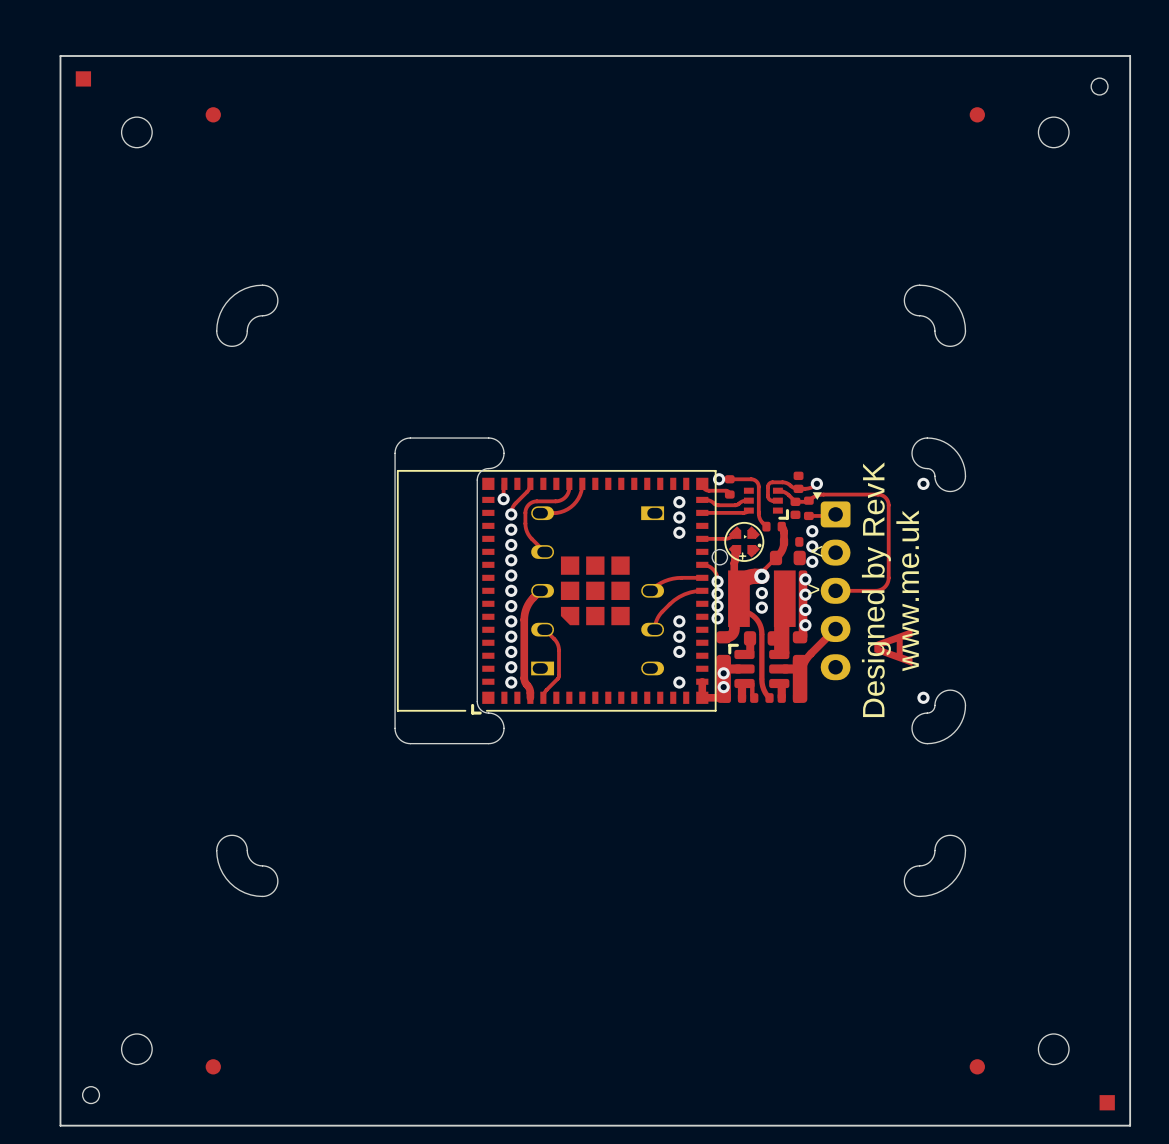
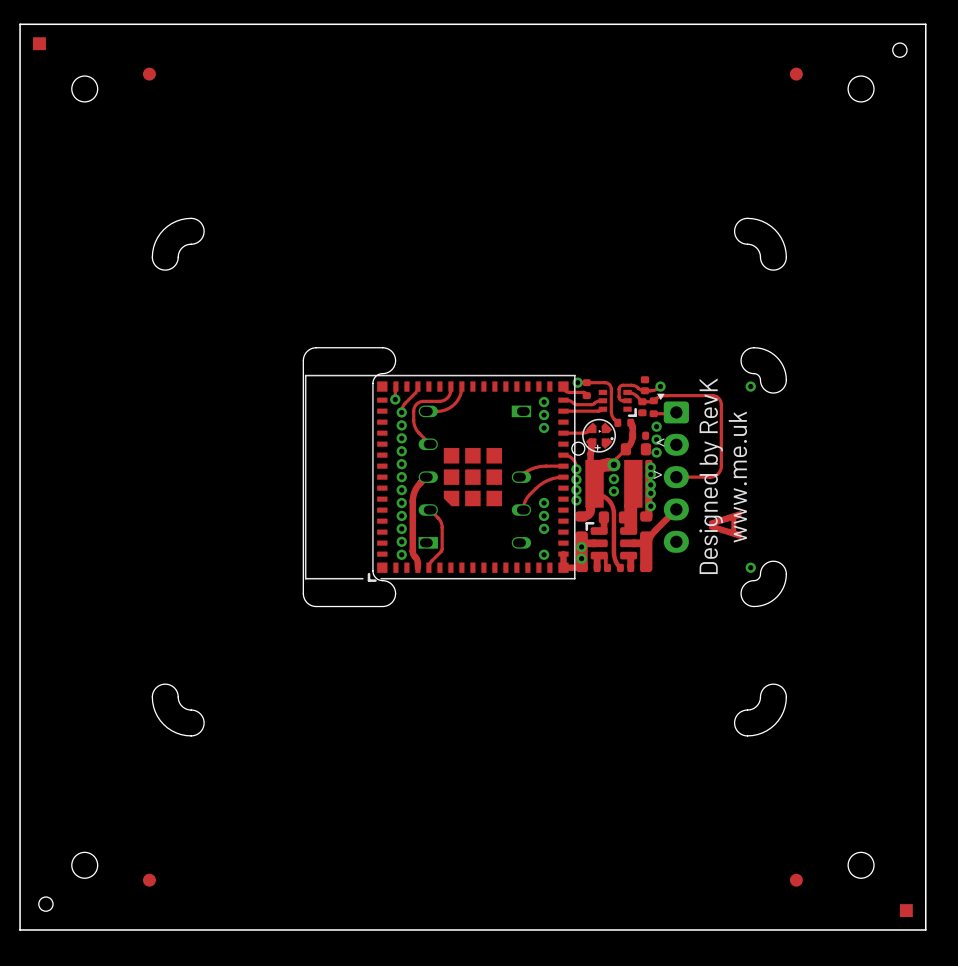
via: none -> (650, 474)
via: (805, 594) -> none
via: none -> (650, 484)

